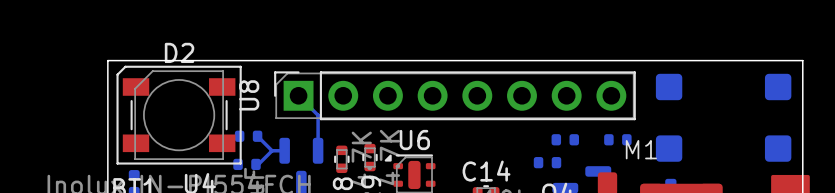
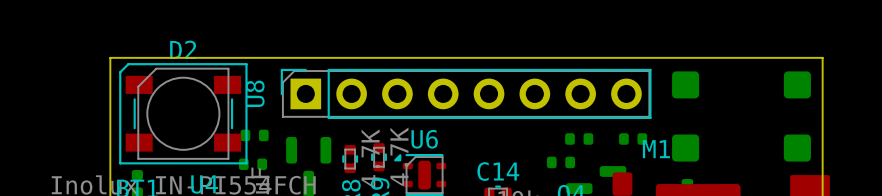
bottom track: (298, 95) (318, 115) (318, 150) -> none
bottom track: (257, 136) (272, 150) -> none
bottom track: (272, 150) (284, 150) -> none
bottom track: (272, 150) (258, 164) (255, 164) -> none

